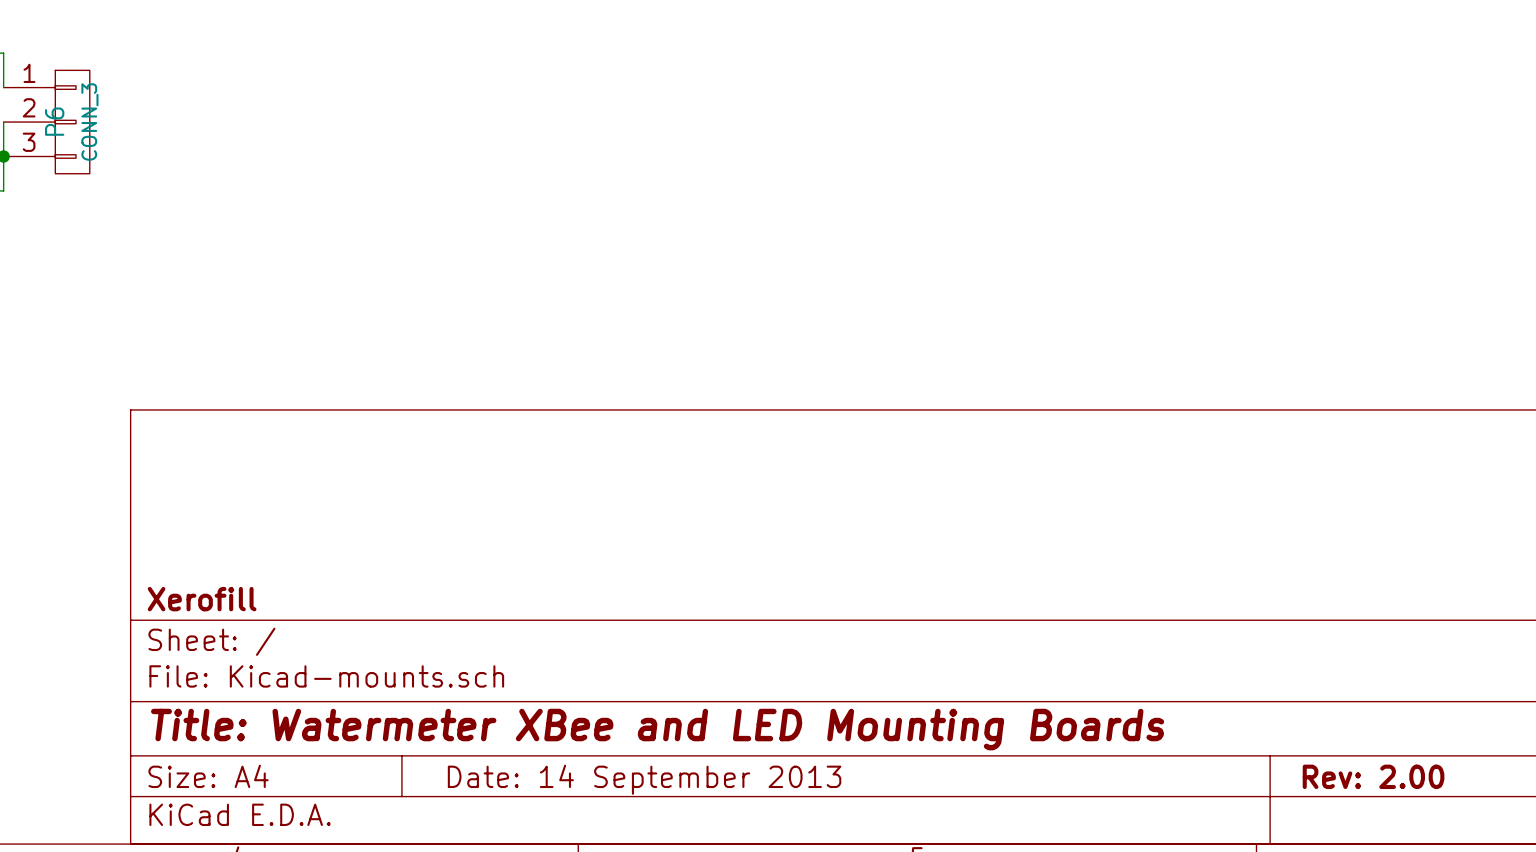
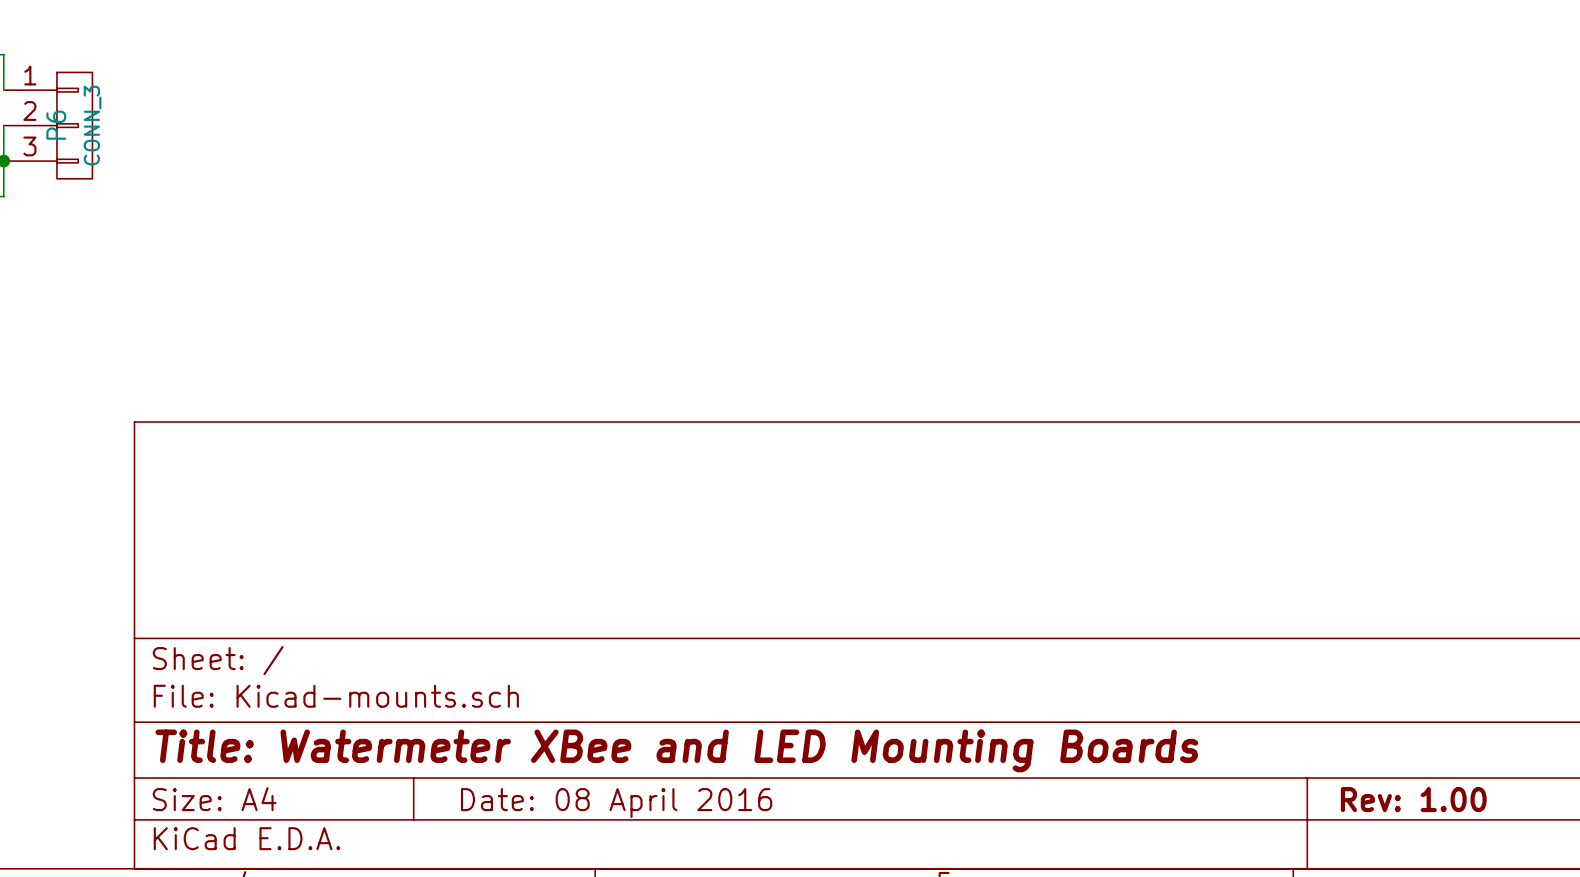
title block: Xerofill (202, 599) -> none
title block: Rev: 2.00 (1373, 776) -> Rev: 1.00 (1413, 799)
title block: Date: 14 September 2013 (644, 779) -> Date: 08 April 2016 (616, 803)

